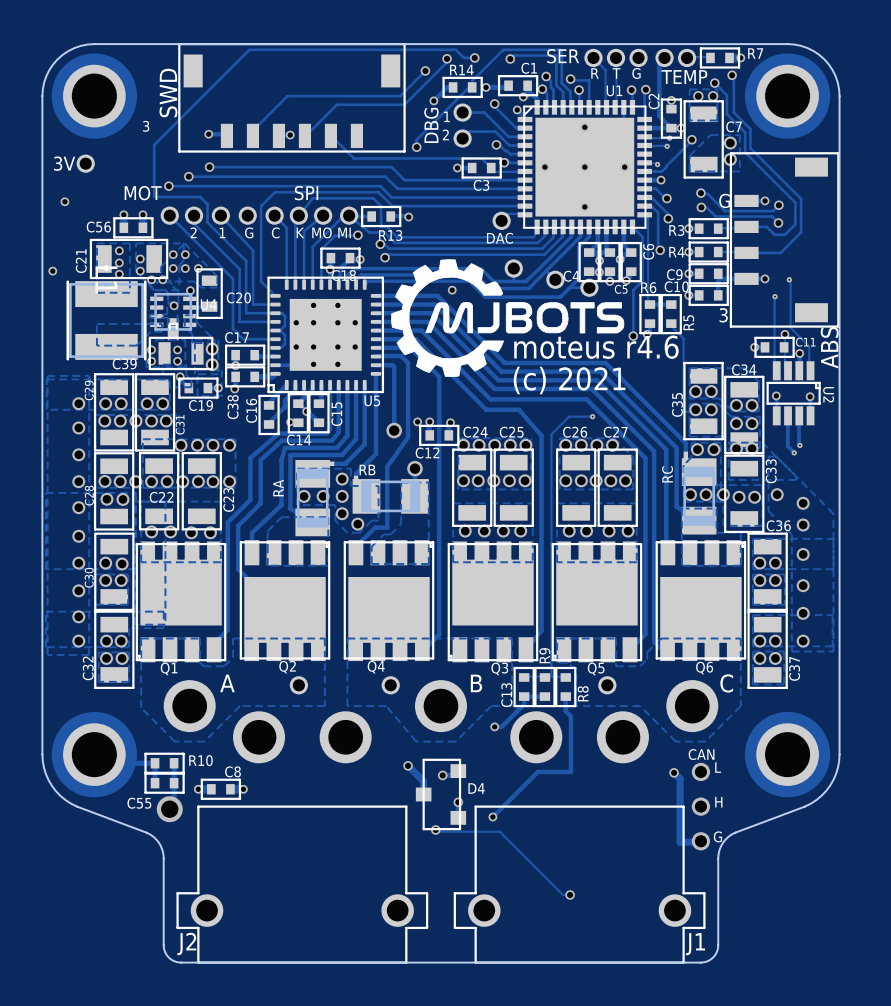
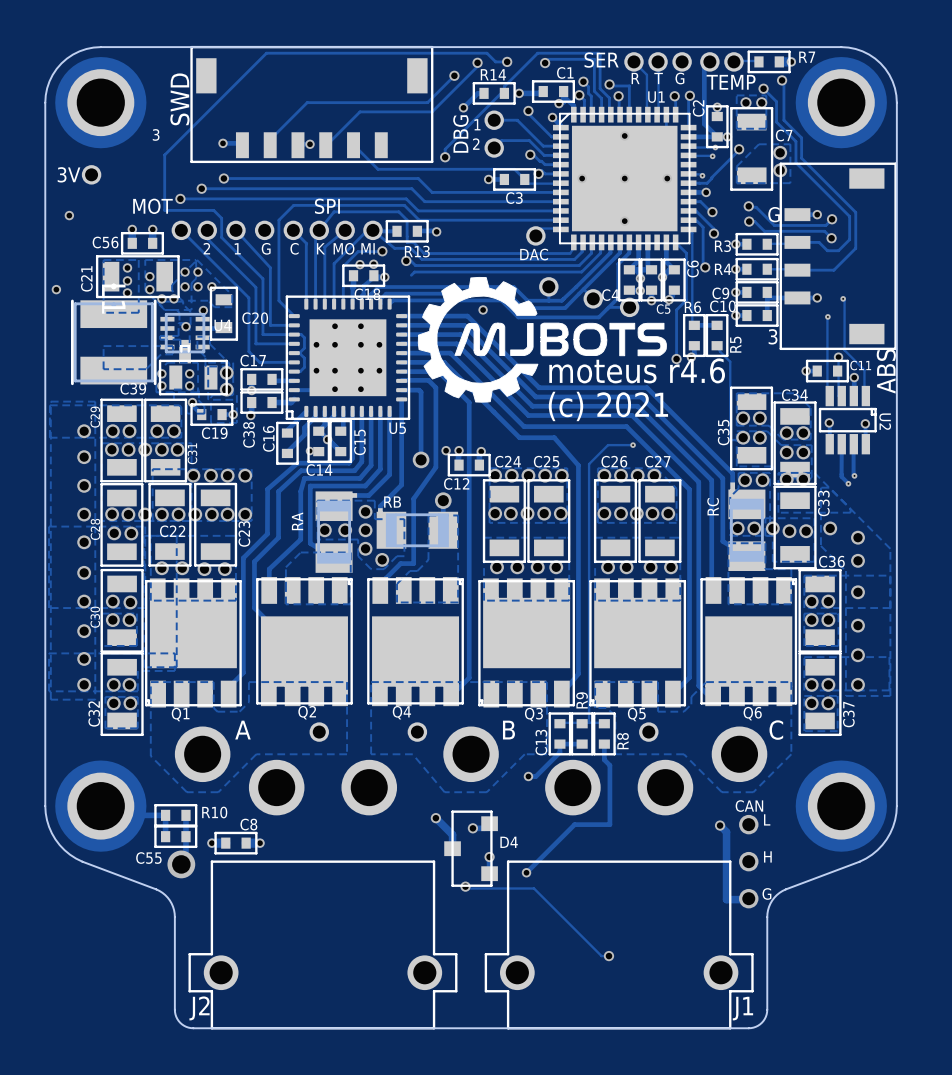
via: none -> (360, 264)
via: none -> (373, 264)
via: (385, 257) -> none
via: (330, 269) -> none

